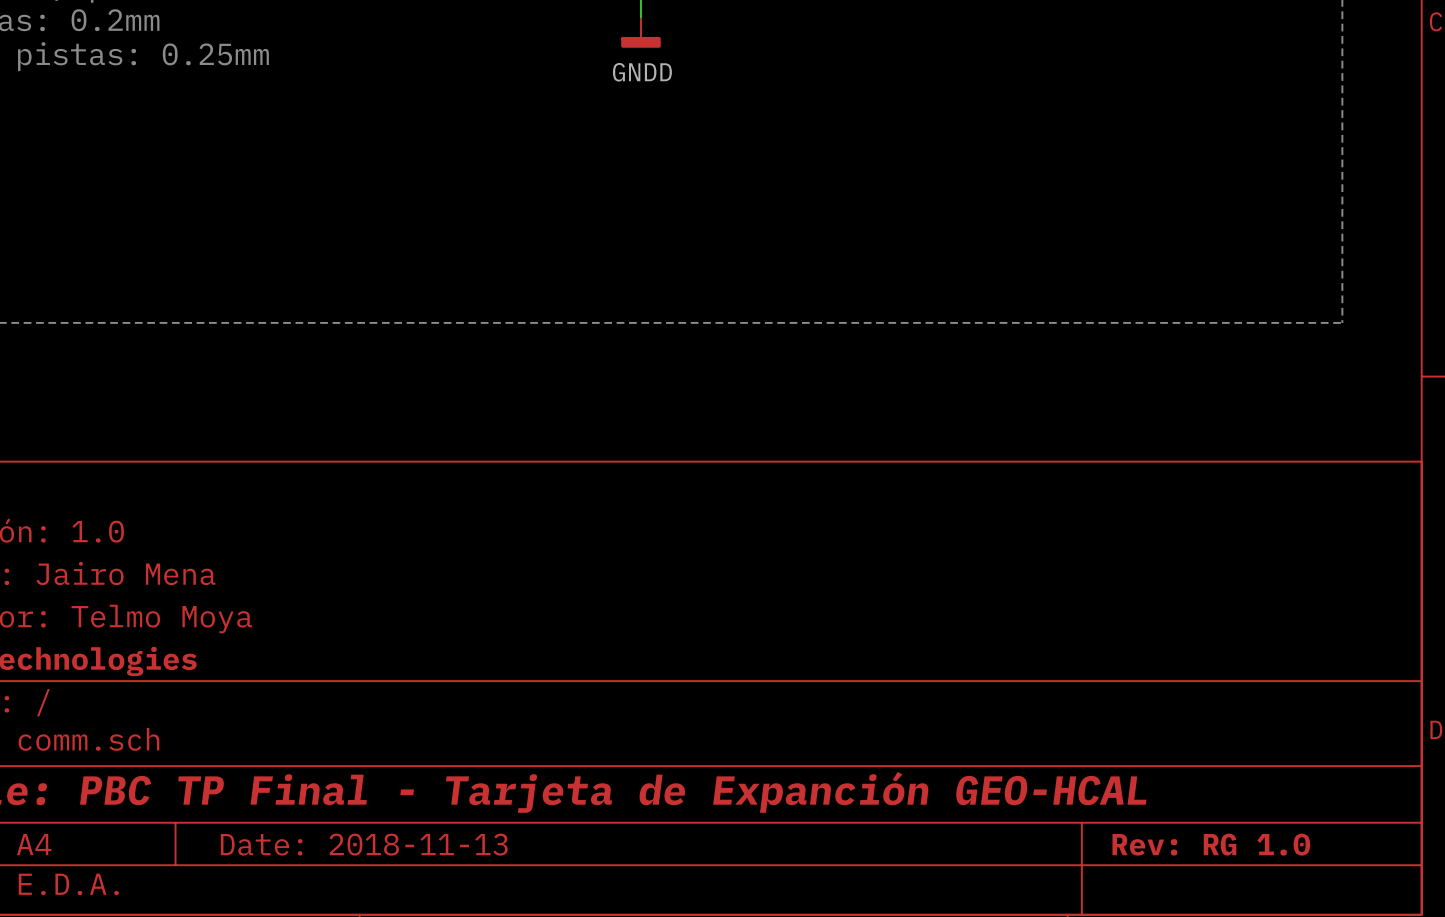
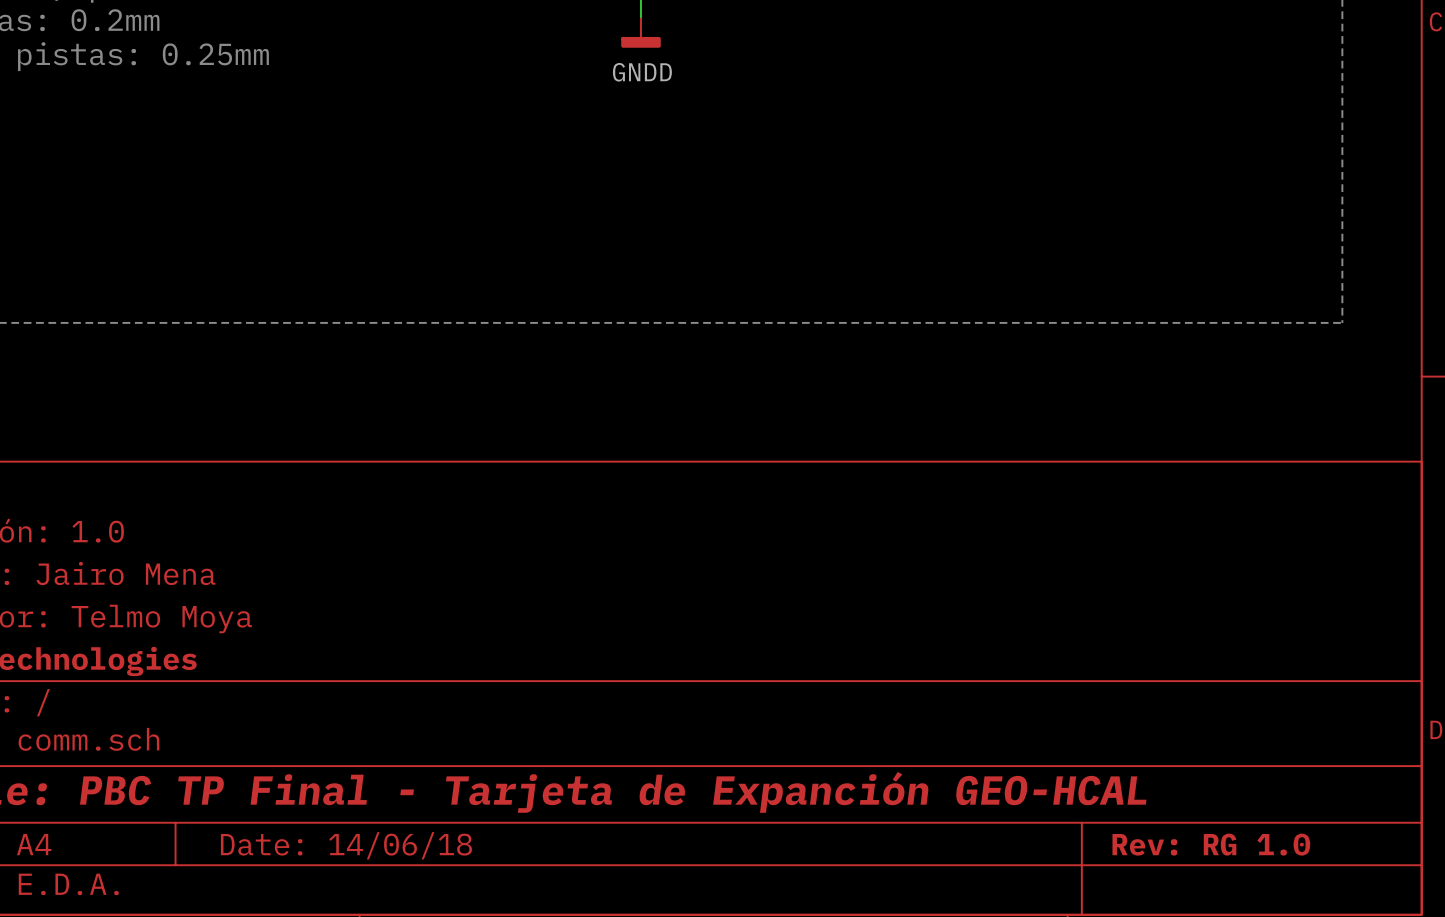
title block: Date: 2018-11-13 (364, 844) -> Date: 14/06/18 (346, 845)

